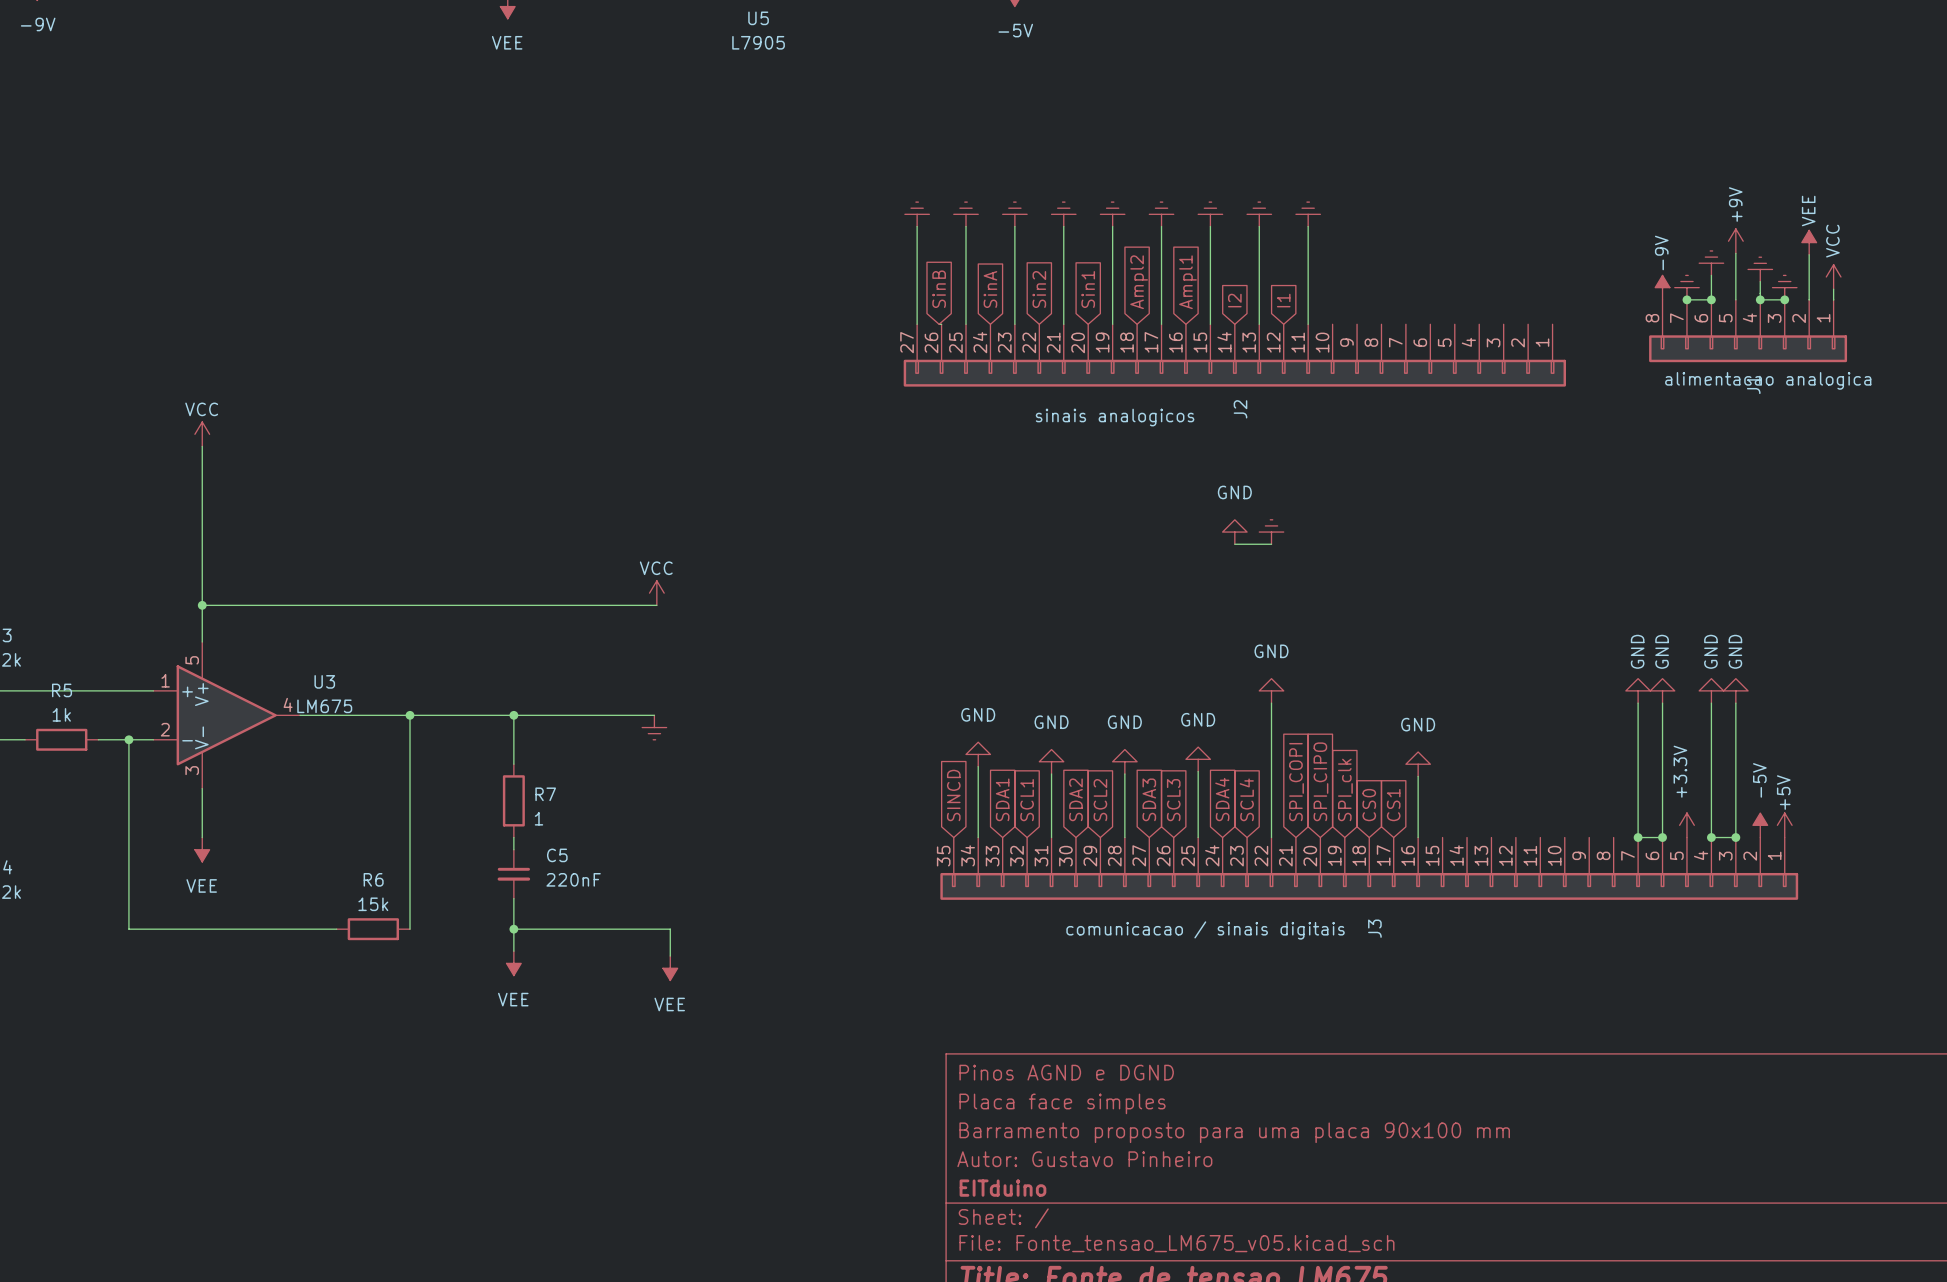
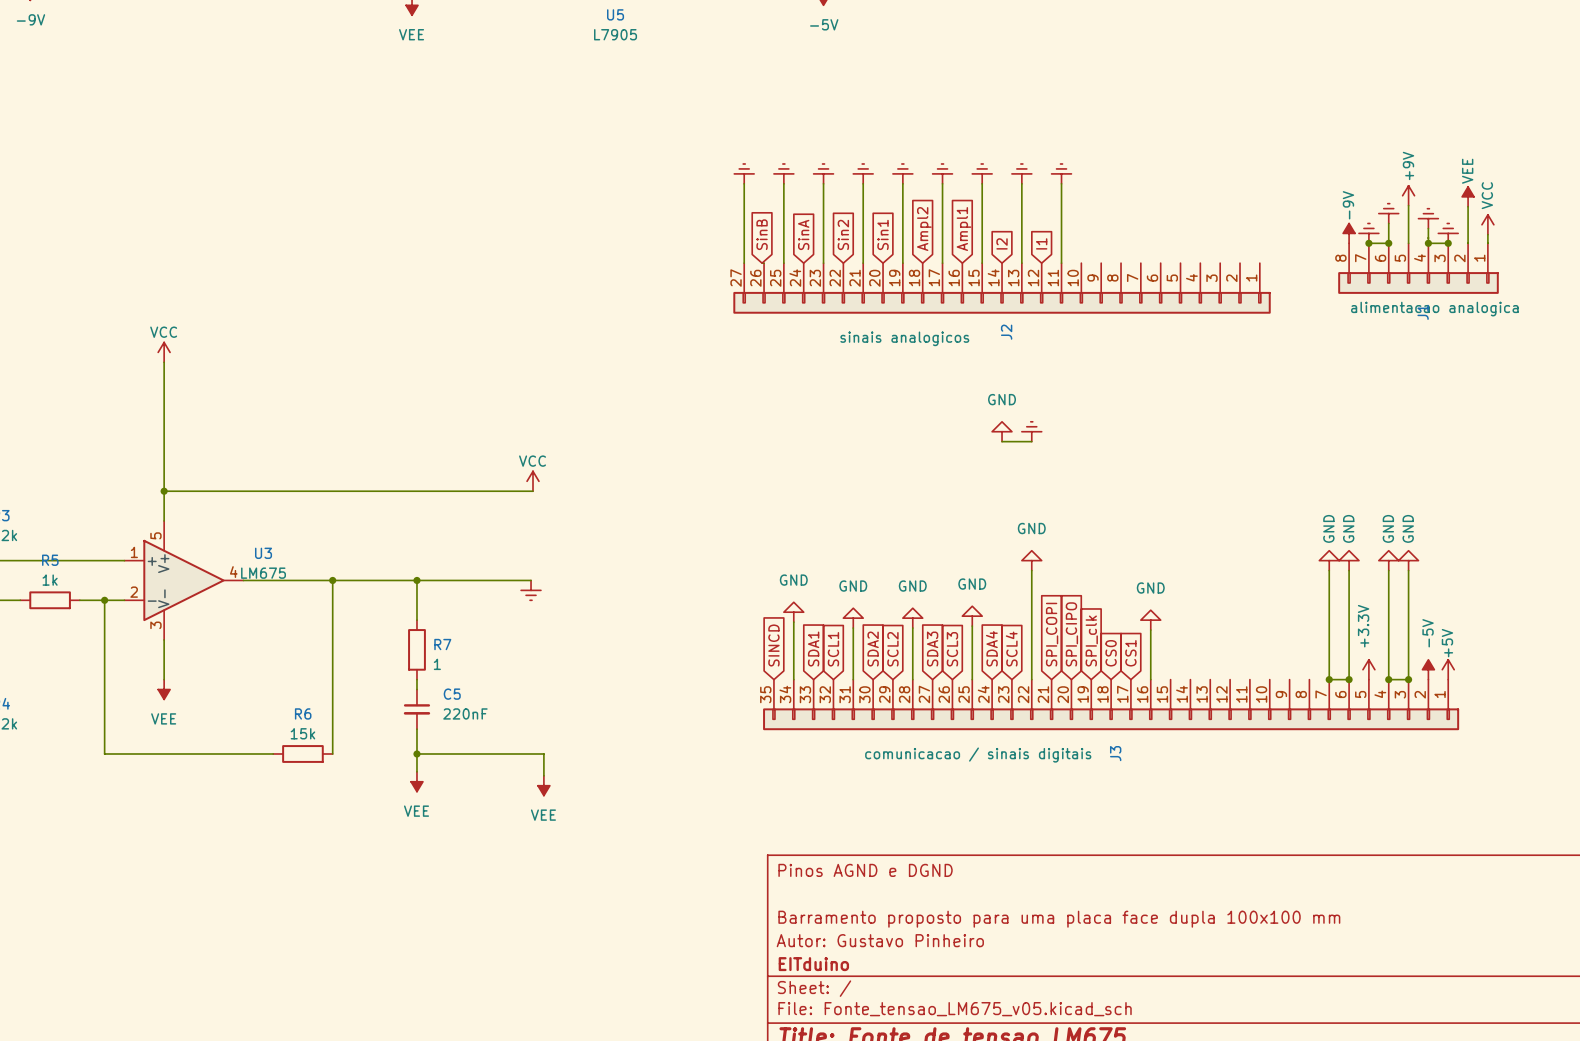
title block: Placa face simples (1062, 1103) -> none
title block: Barramento proposto para uma placa 90x100 mm (1234, 1132) -> Barramento proposto para uma placa face dupla 100x100 mm (1059, 919)

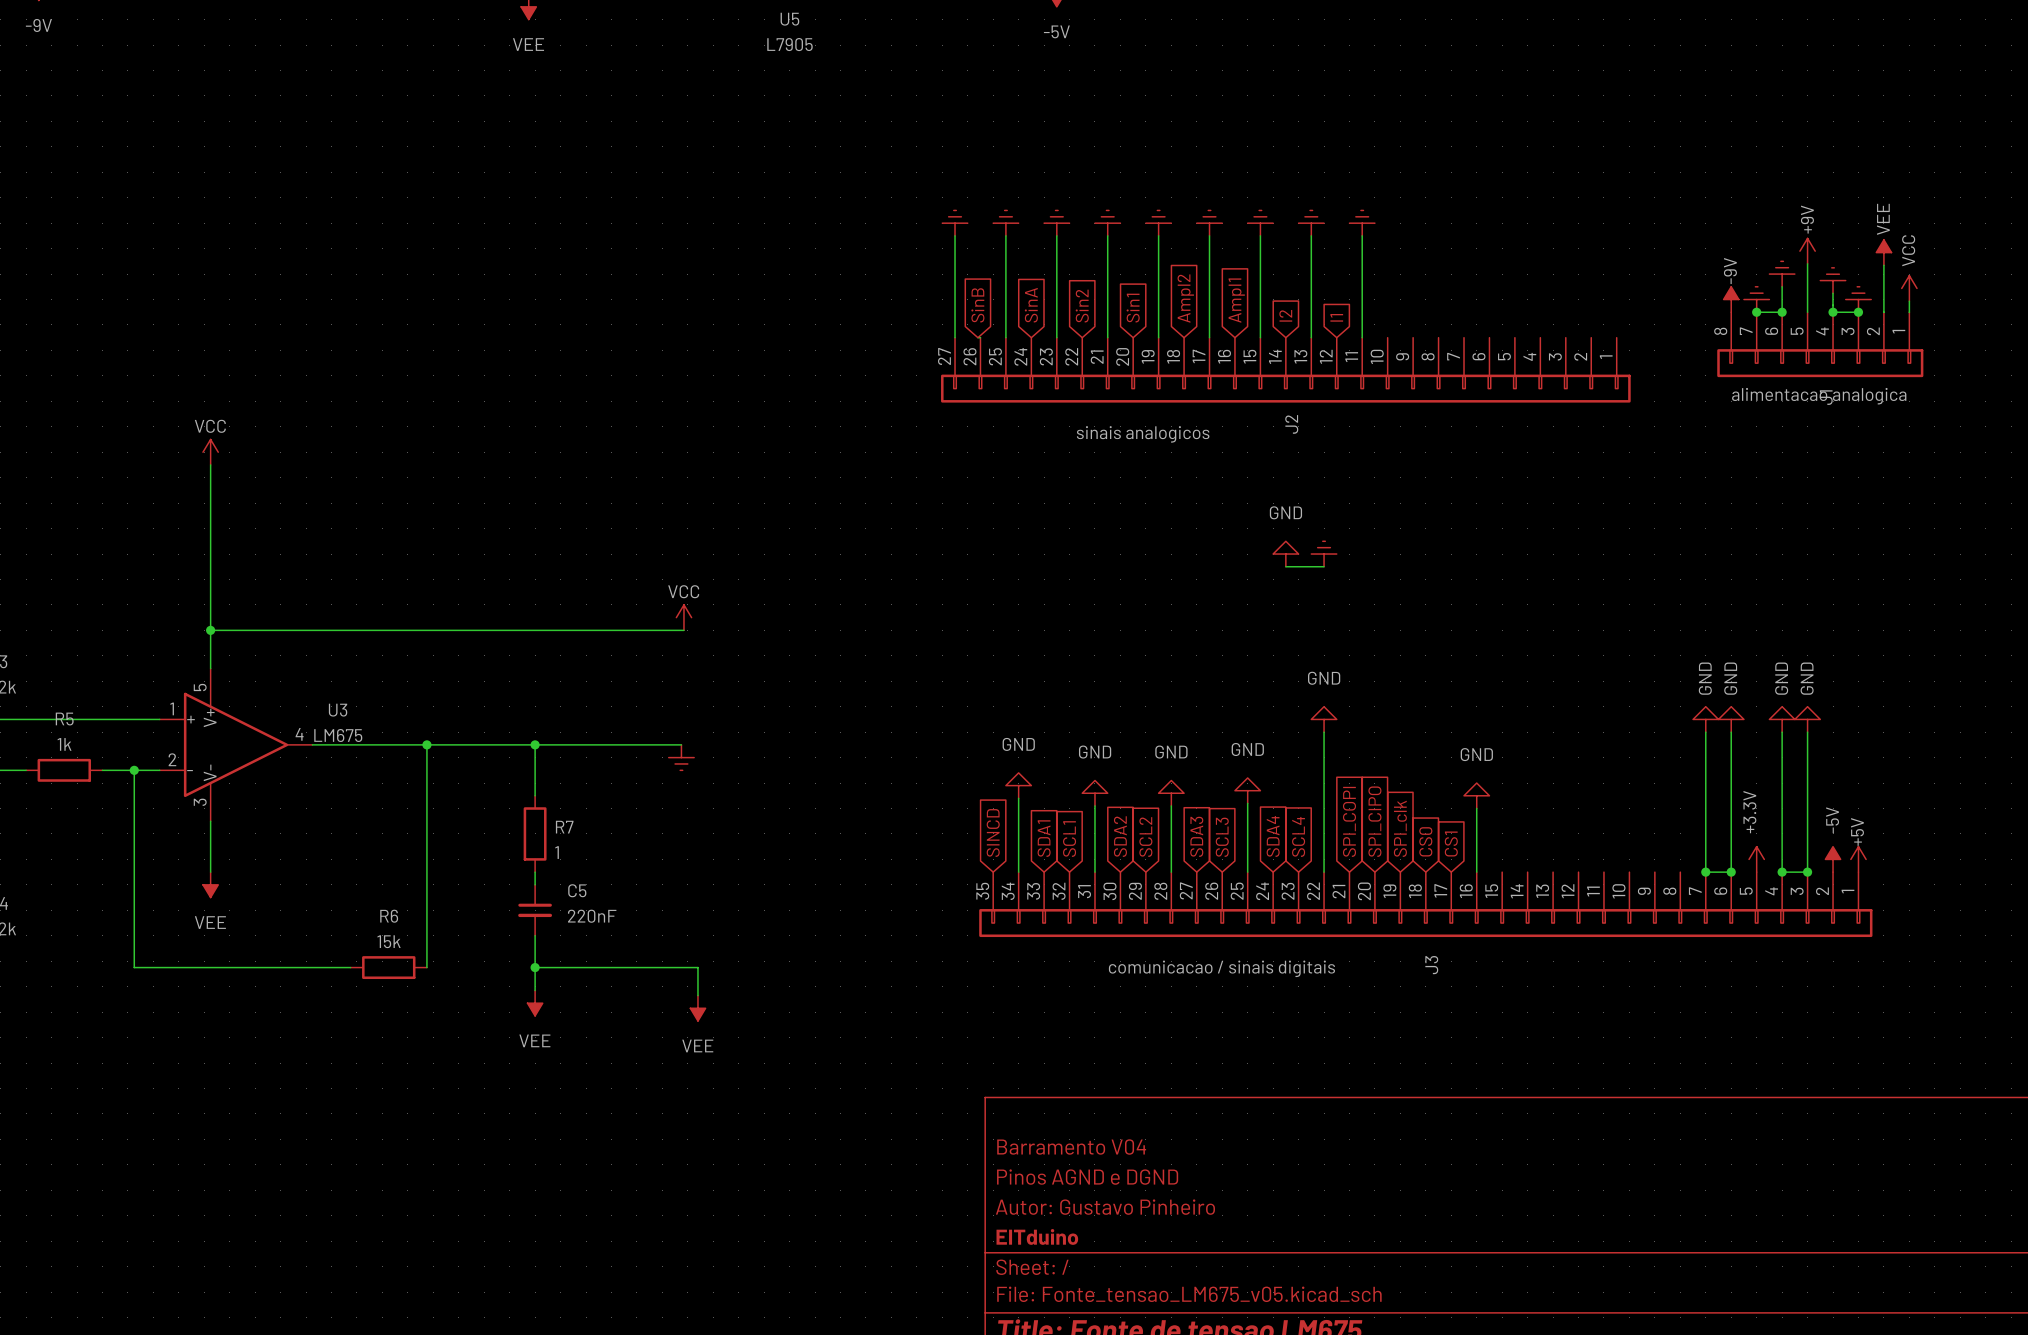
title block: Pinos AGND e DGND (865, 870) -> none
title block: none -> Barramento V04 (1071, 1147)
title block: Barramento proposto para uma placa face dupla 100x100 mm (1059, 919) -> Pinos AGND e DGND (1087, 1177)

